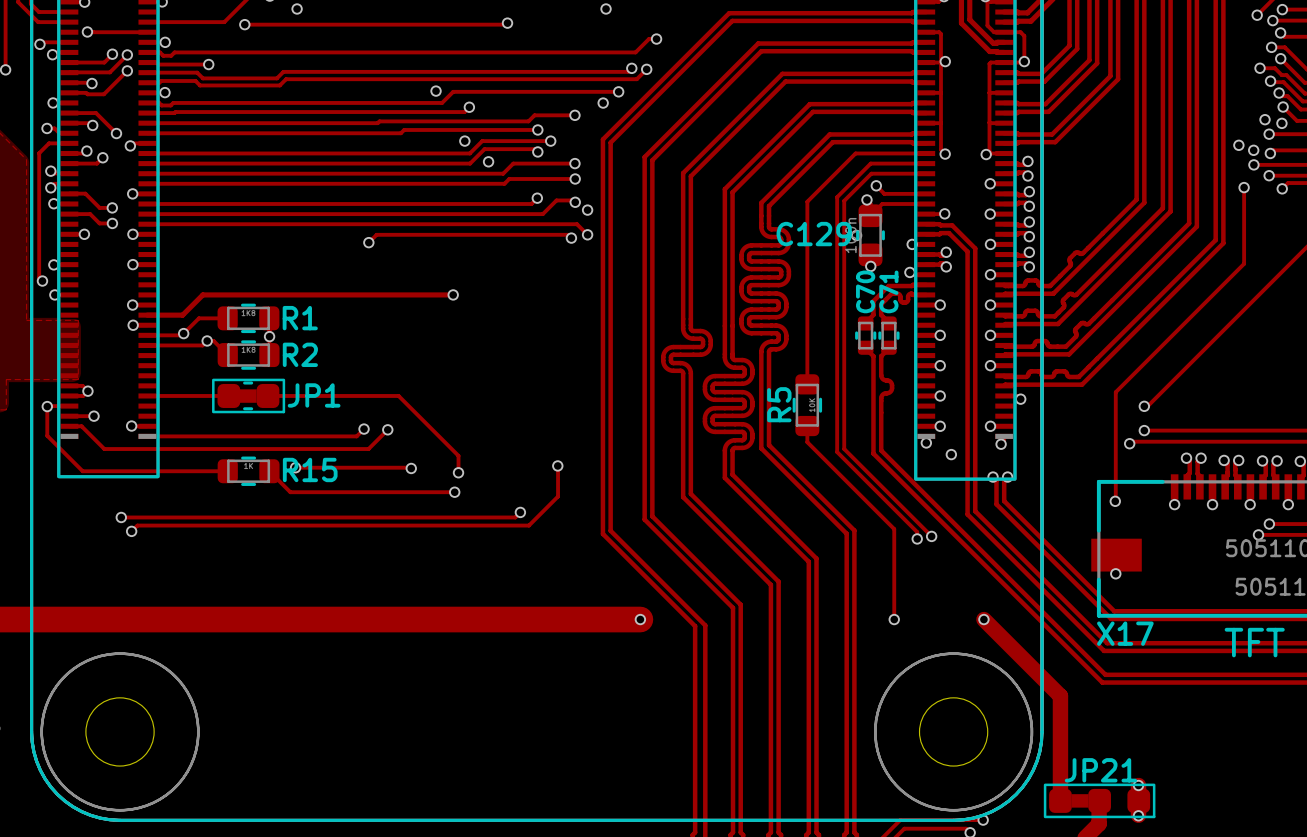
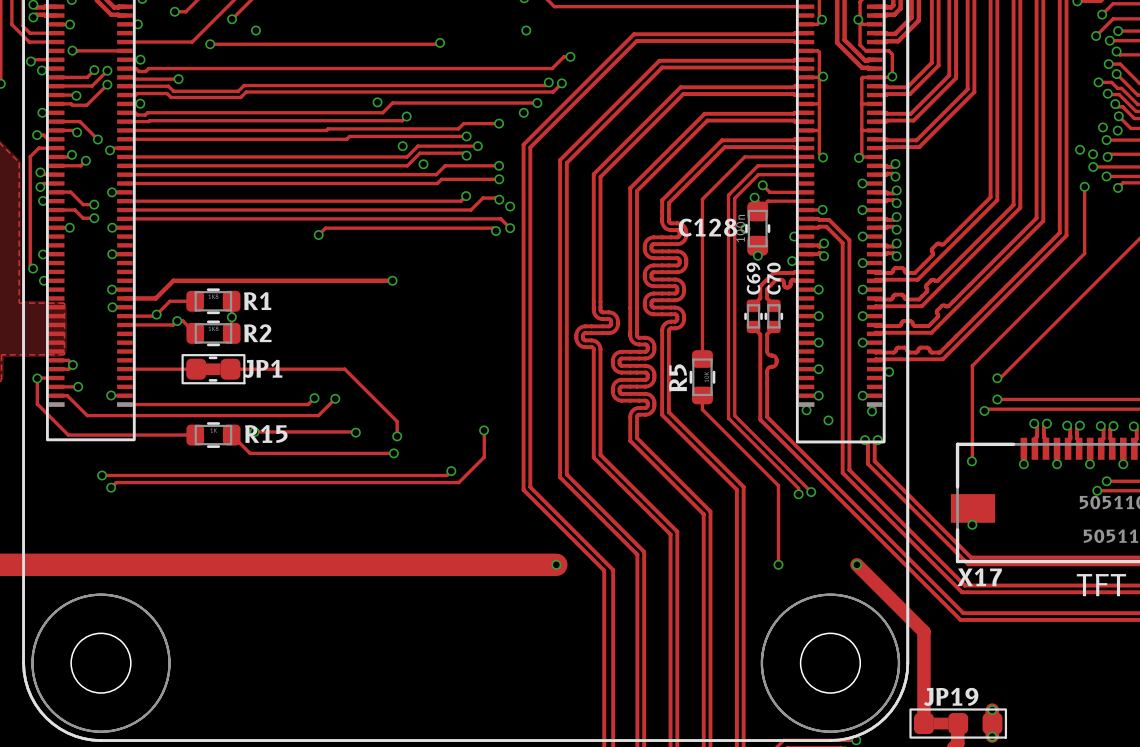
C129 name: C129 (814, 234) -> C128 (707, 227)
C70 name: C70 (865, 291) -> C69 (753, 278)
C71 name: C71 (888, 291) -> C70 (773, 278)
JP21 name: JP21 (1100, 770) -> JP19 (951, 696)

